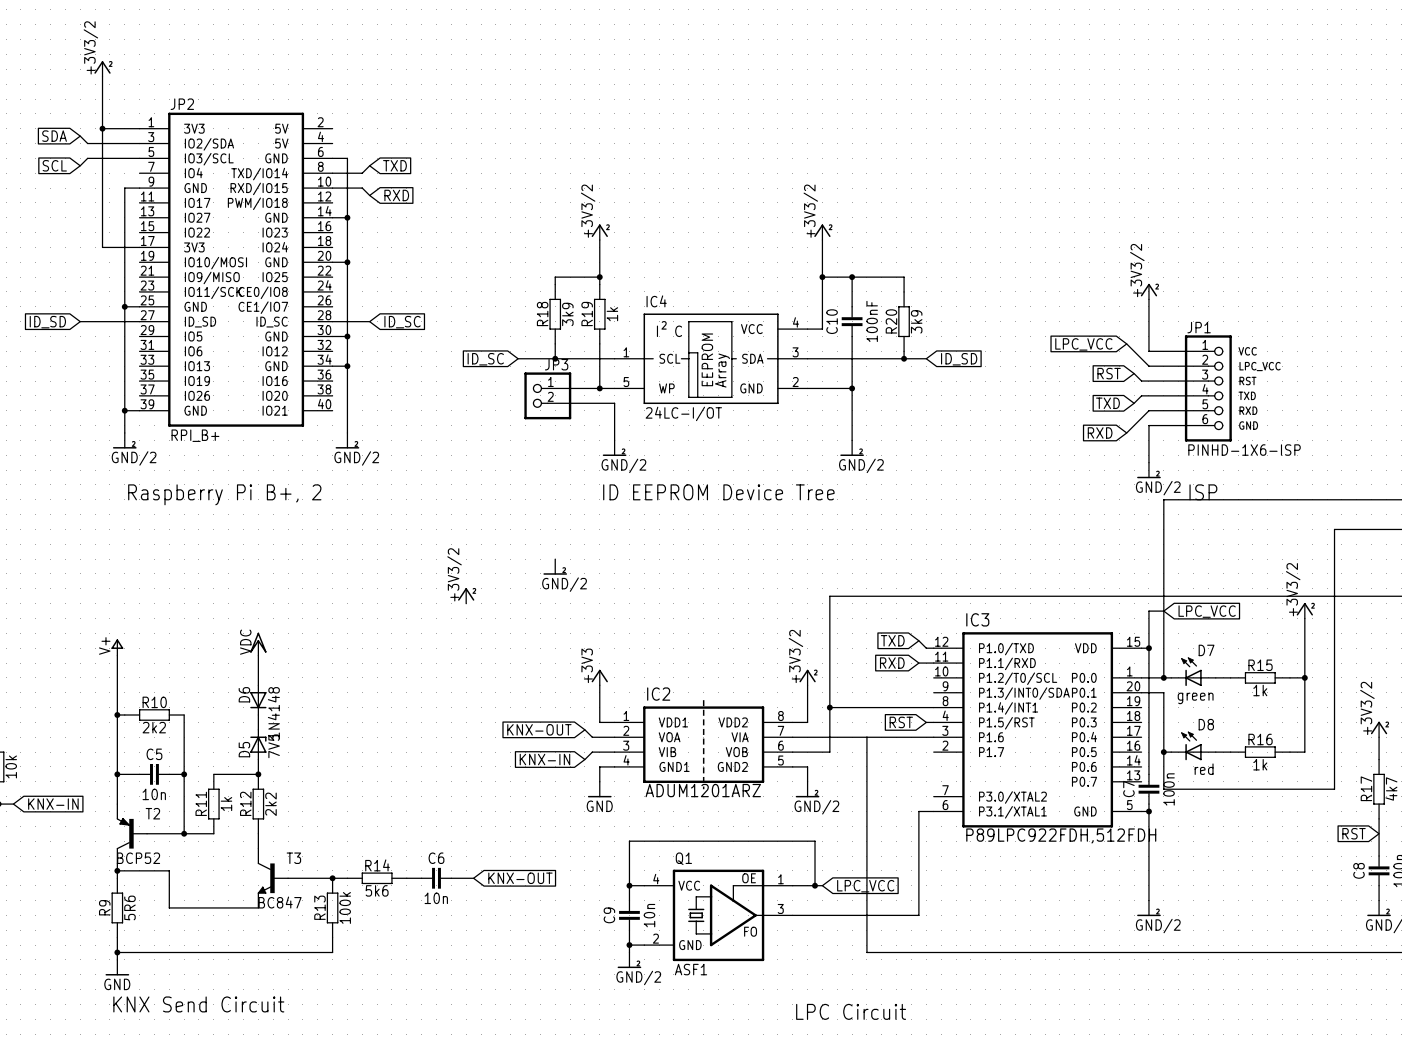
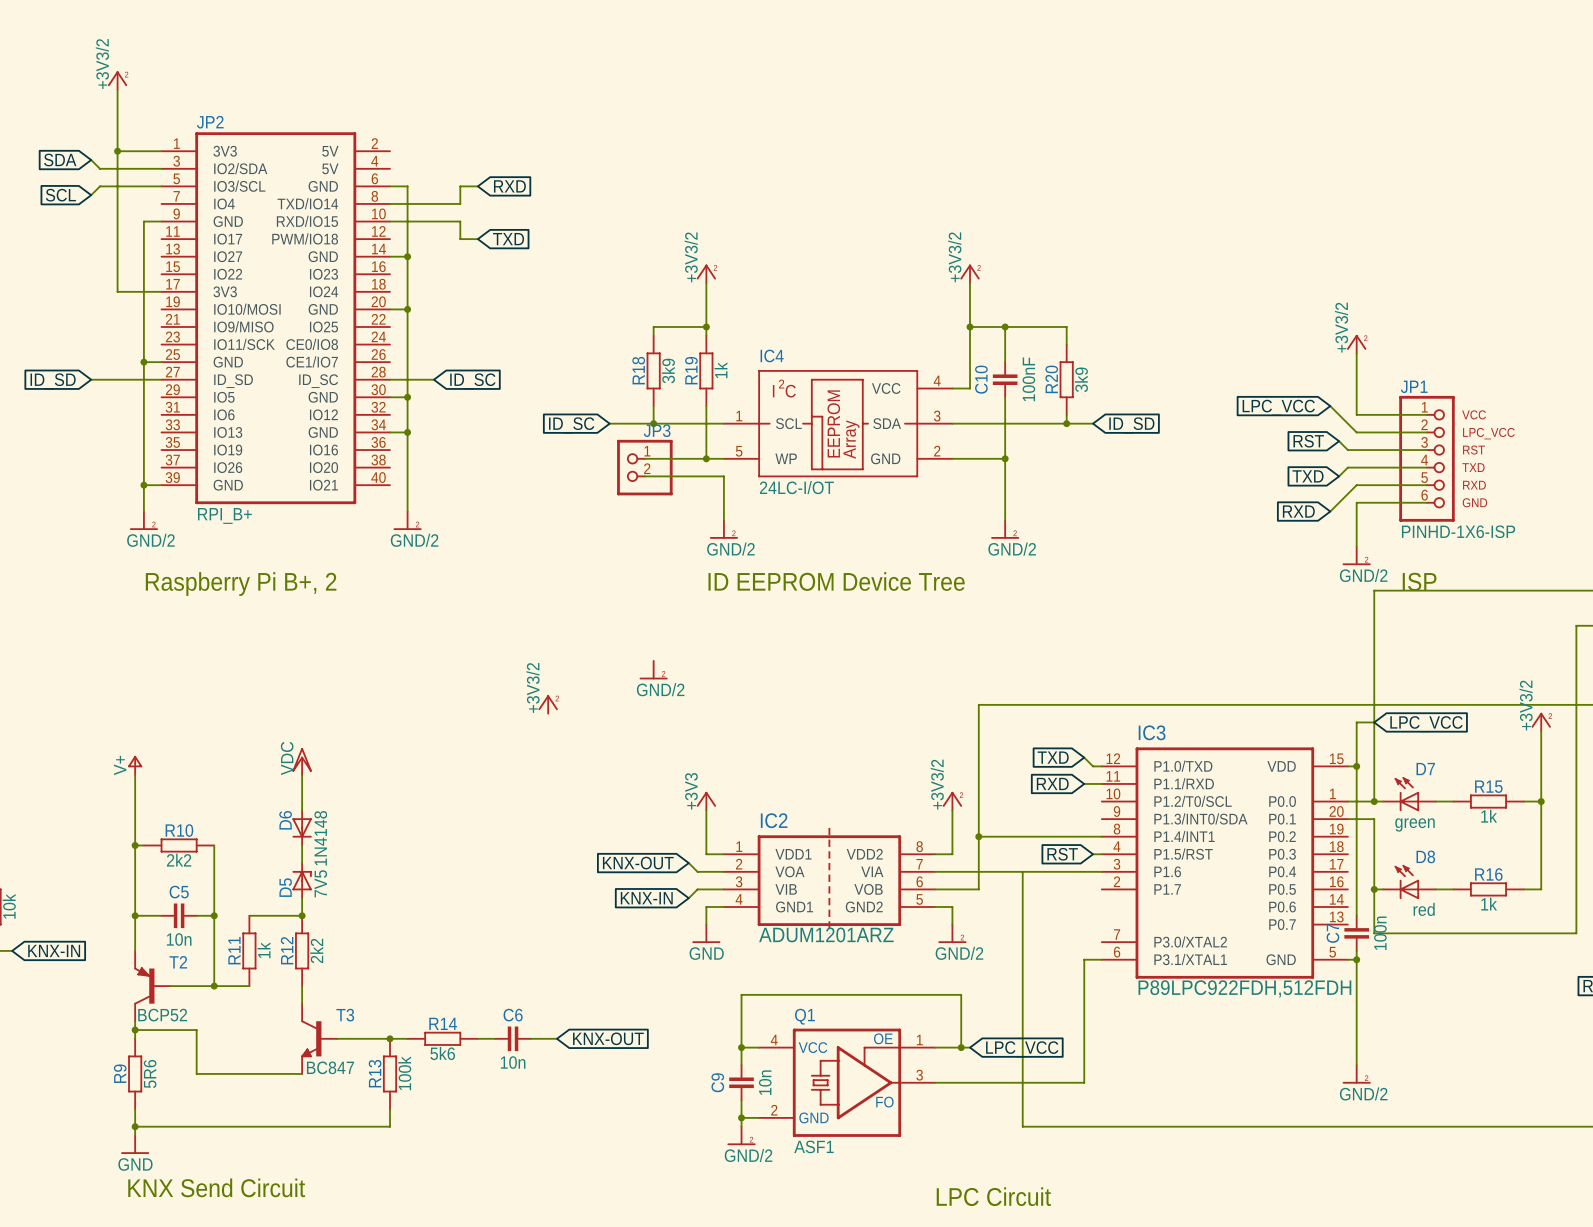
wire: (369, 165) (362, 173) -> (477, 186) (460, 186) (460, 203) (425, 203)
global label position: TXD (394, 165) -> TXD (508, 239)
wire: (362, 188) (369, 195) -> (425, 221) (460, 221) (460, 239) (477, 239)
global label position: RXD (396, 195) -> RXD (509, 186)

